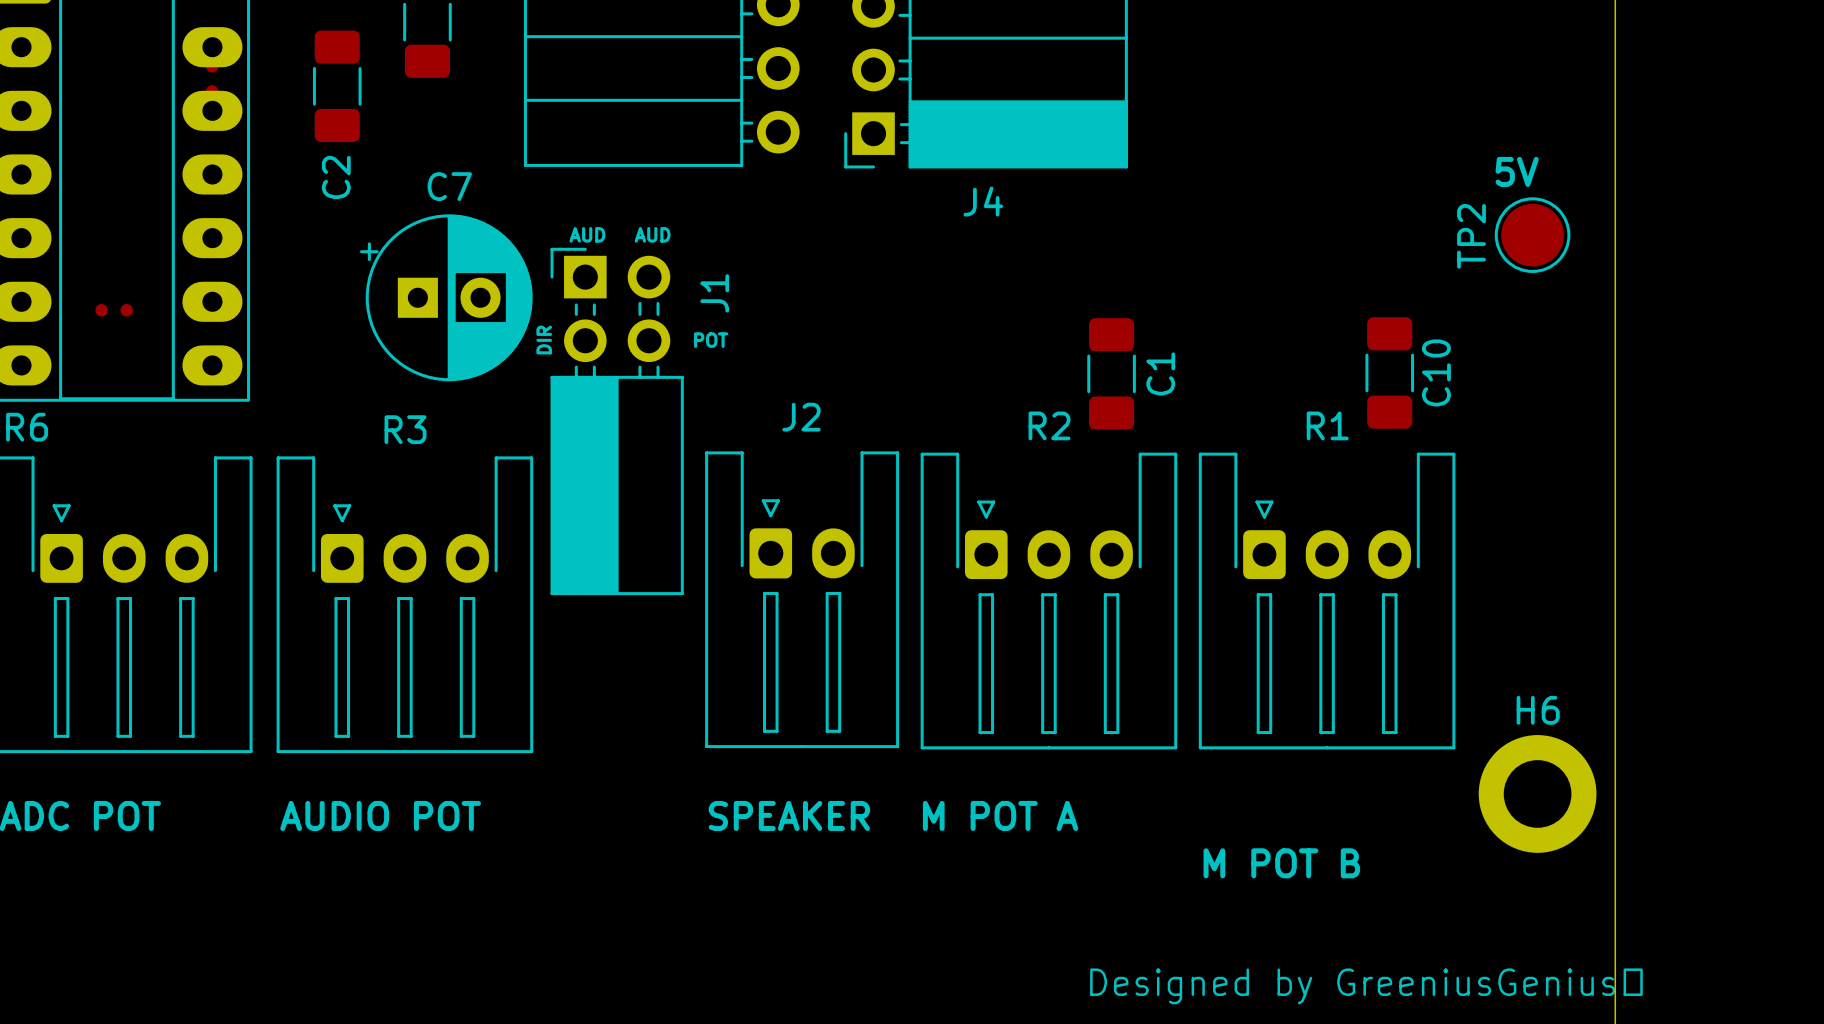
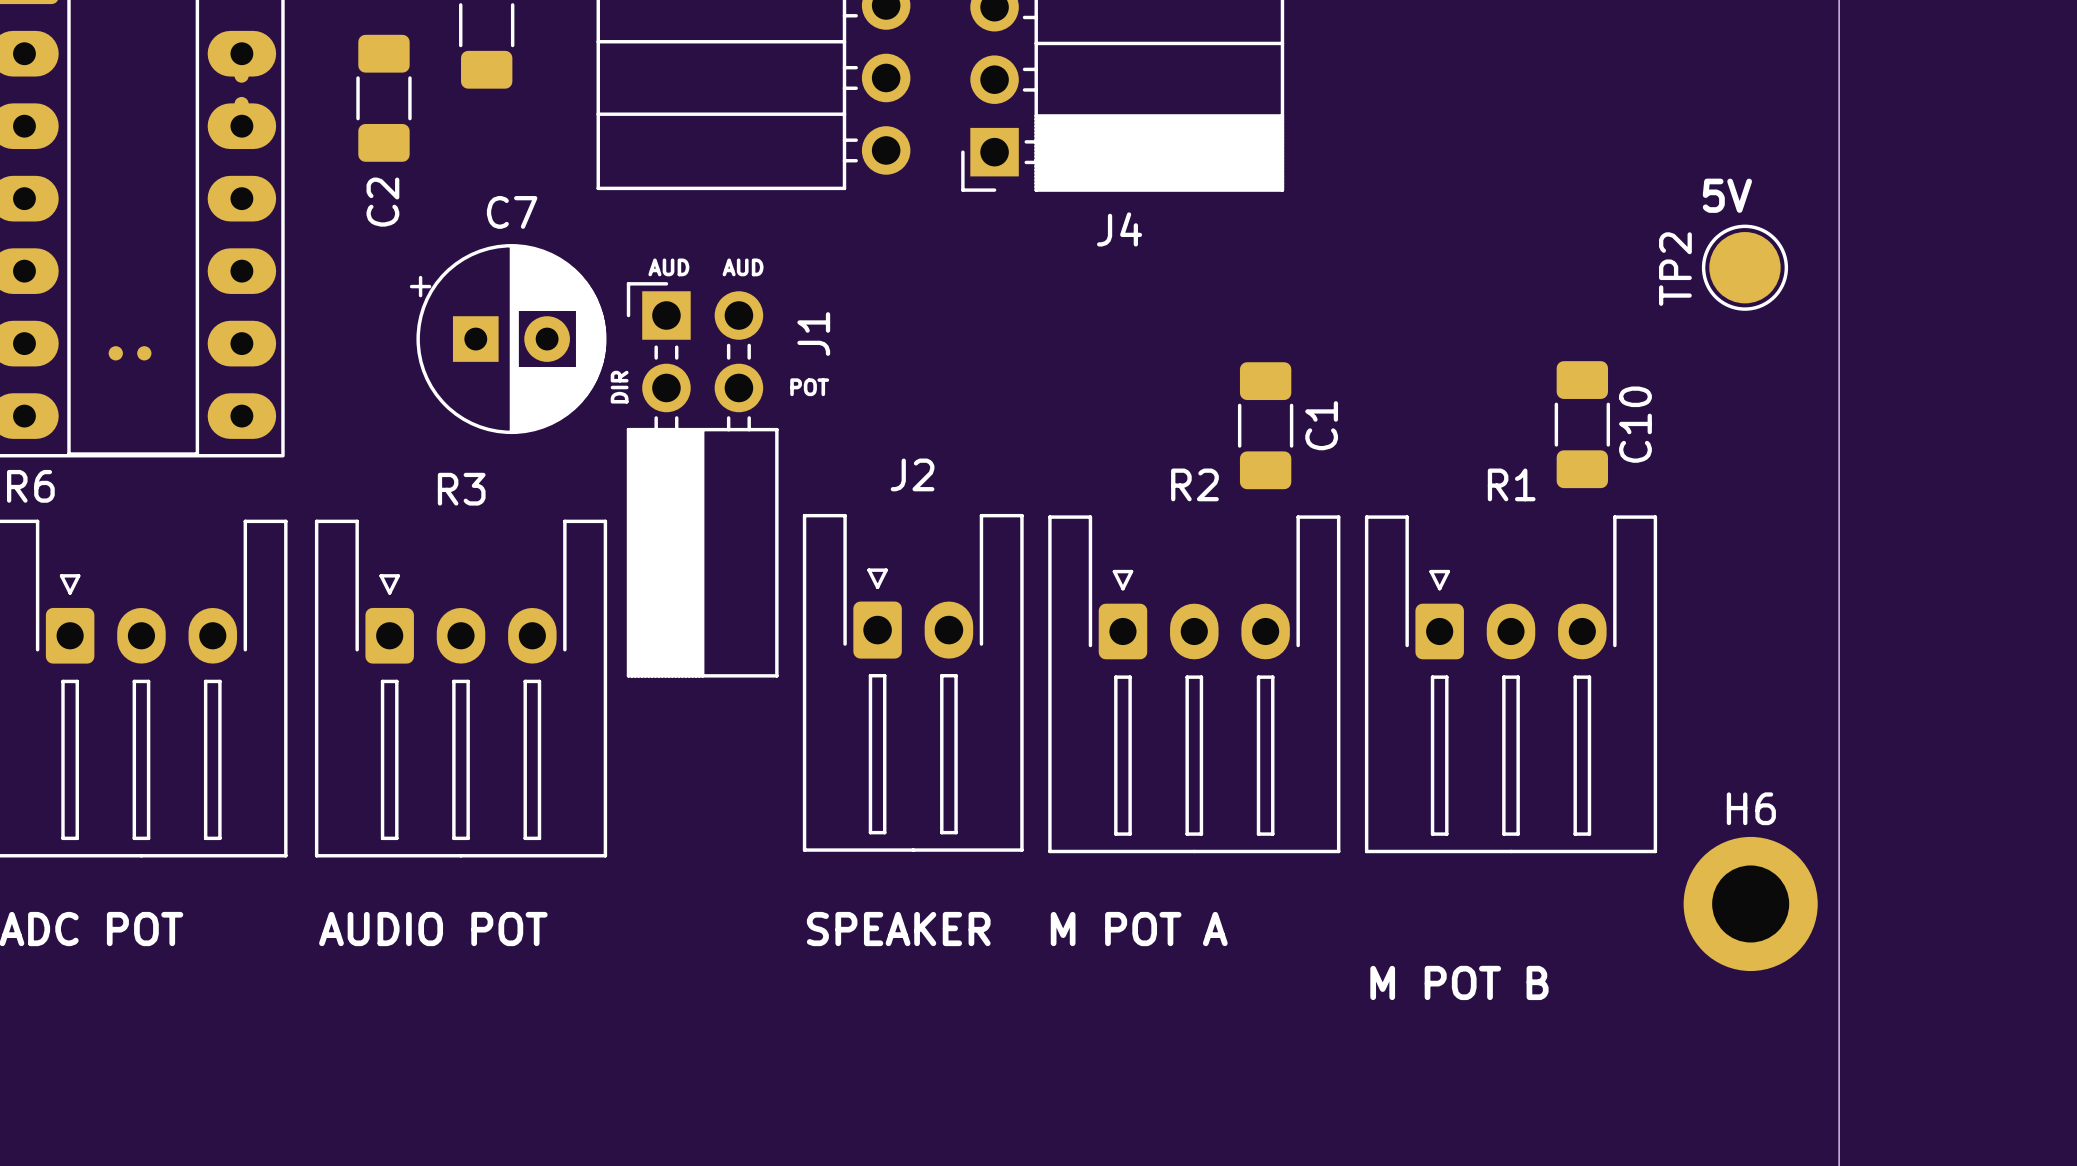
text: Designed by GreeniusGenius™ (1366, 986) -> none

